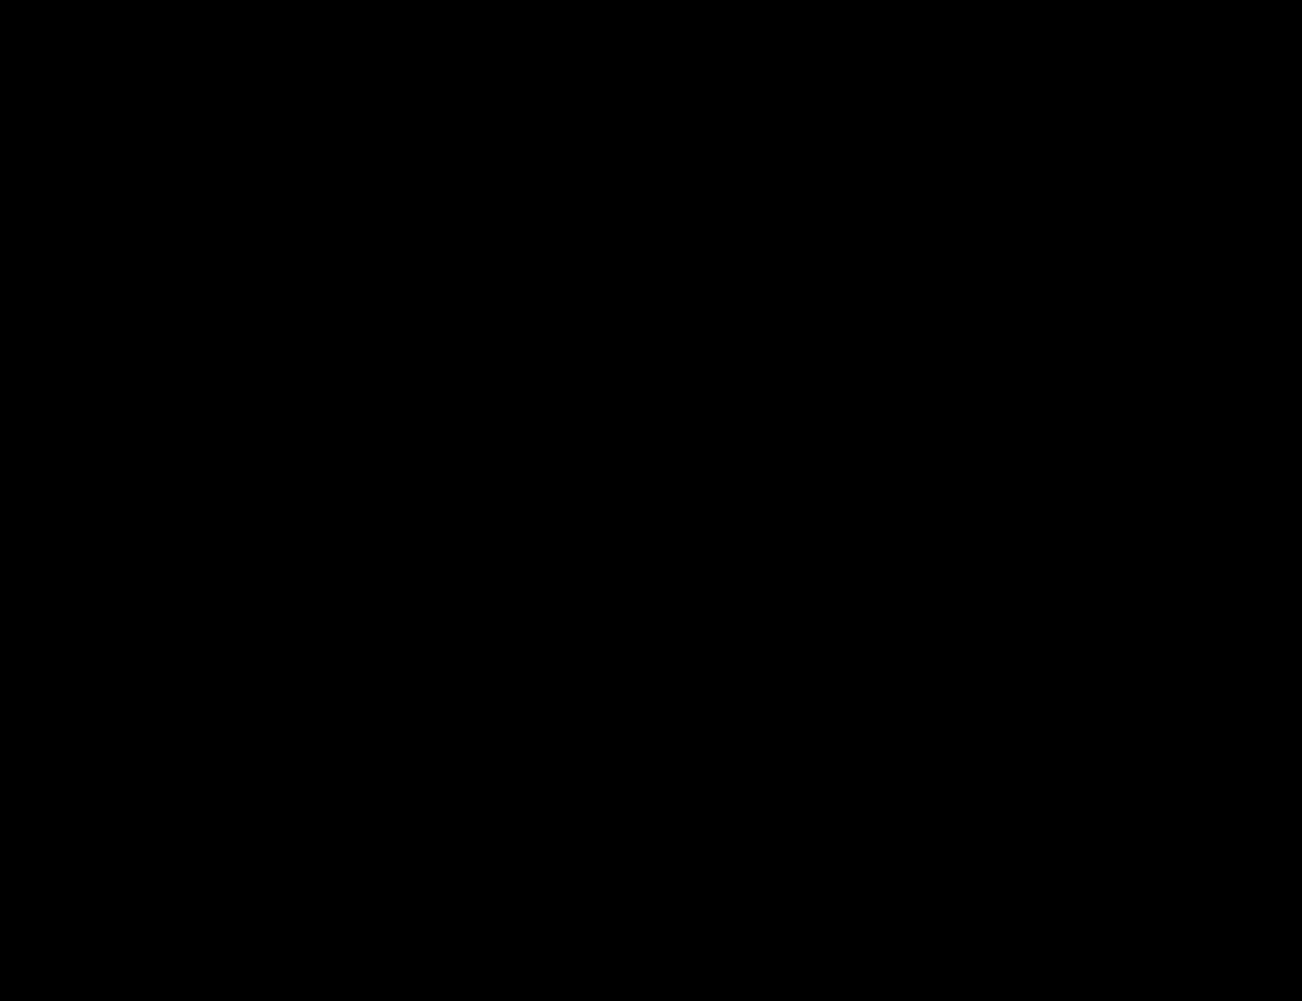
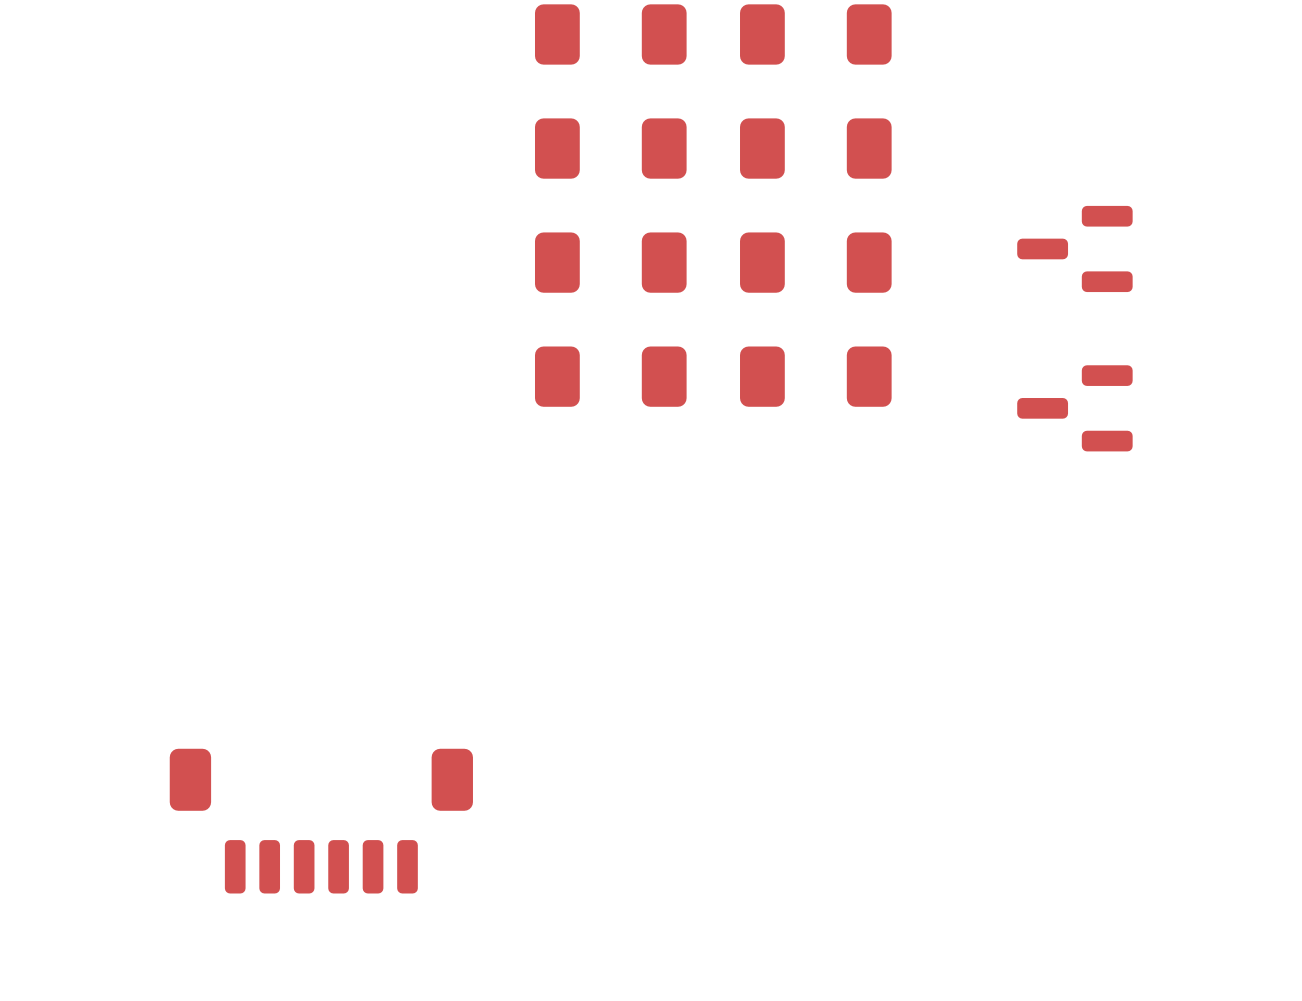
part: none -> (610, 34)
part: none -> (815, 34)
part: none -> (610, 148)
part: none -> (815, 148)
part: none -> (1074, 248)
part: none -> (610, 262)
part: none -> (815, 262)
part: none -> (610, 376)
part: none -> (815, 376)
part: none -> (1074, 408)
part: none -> (321, 821)

